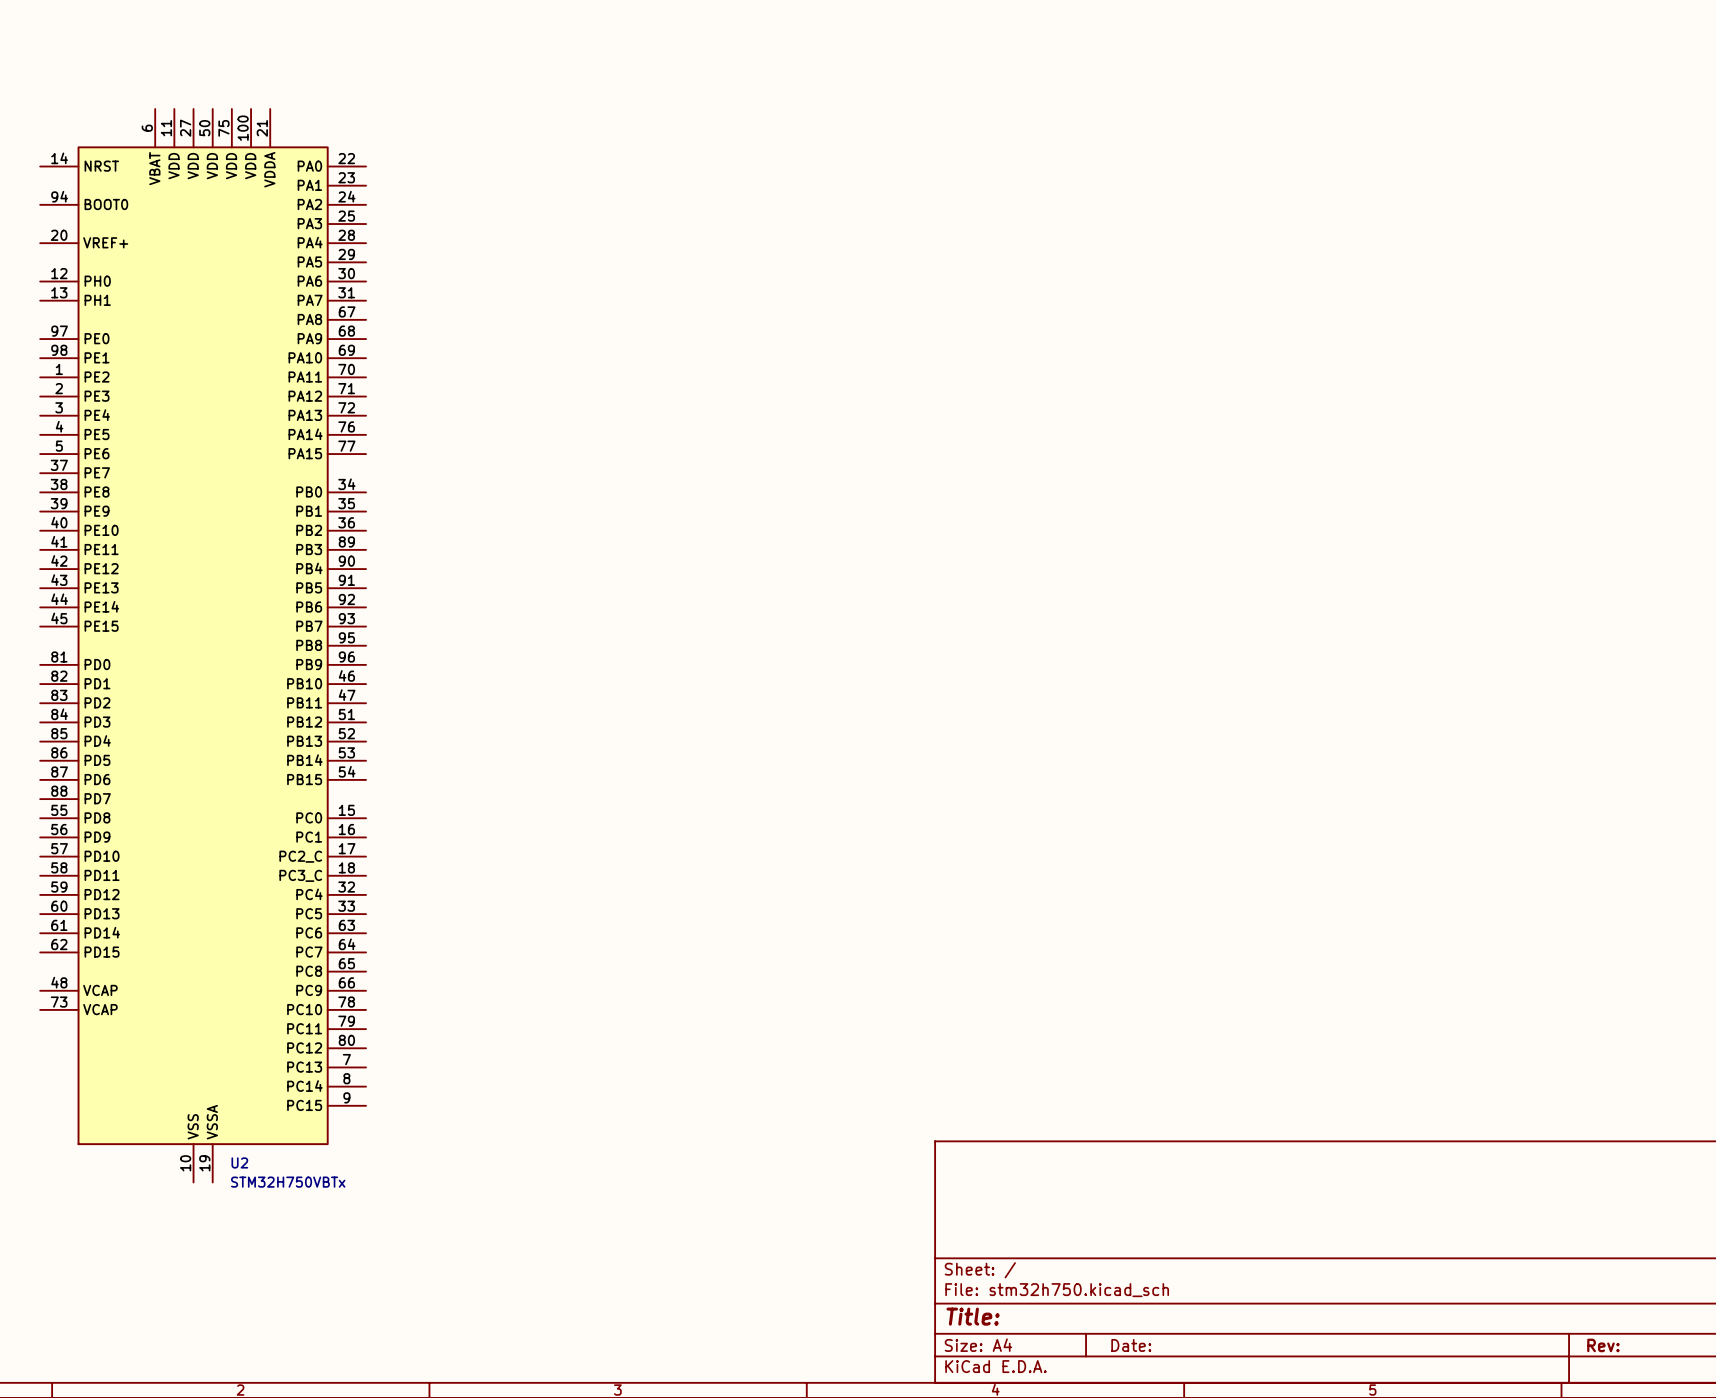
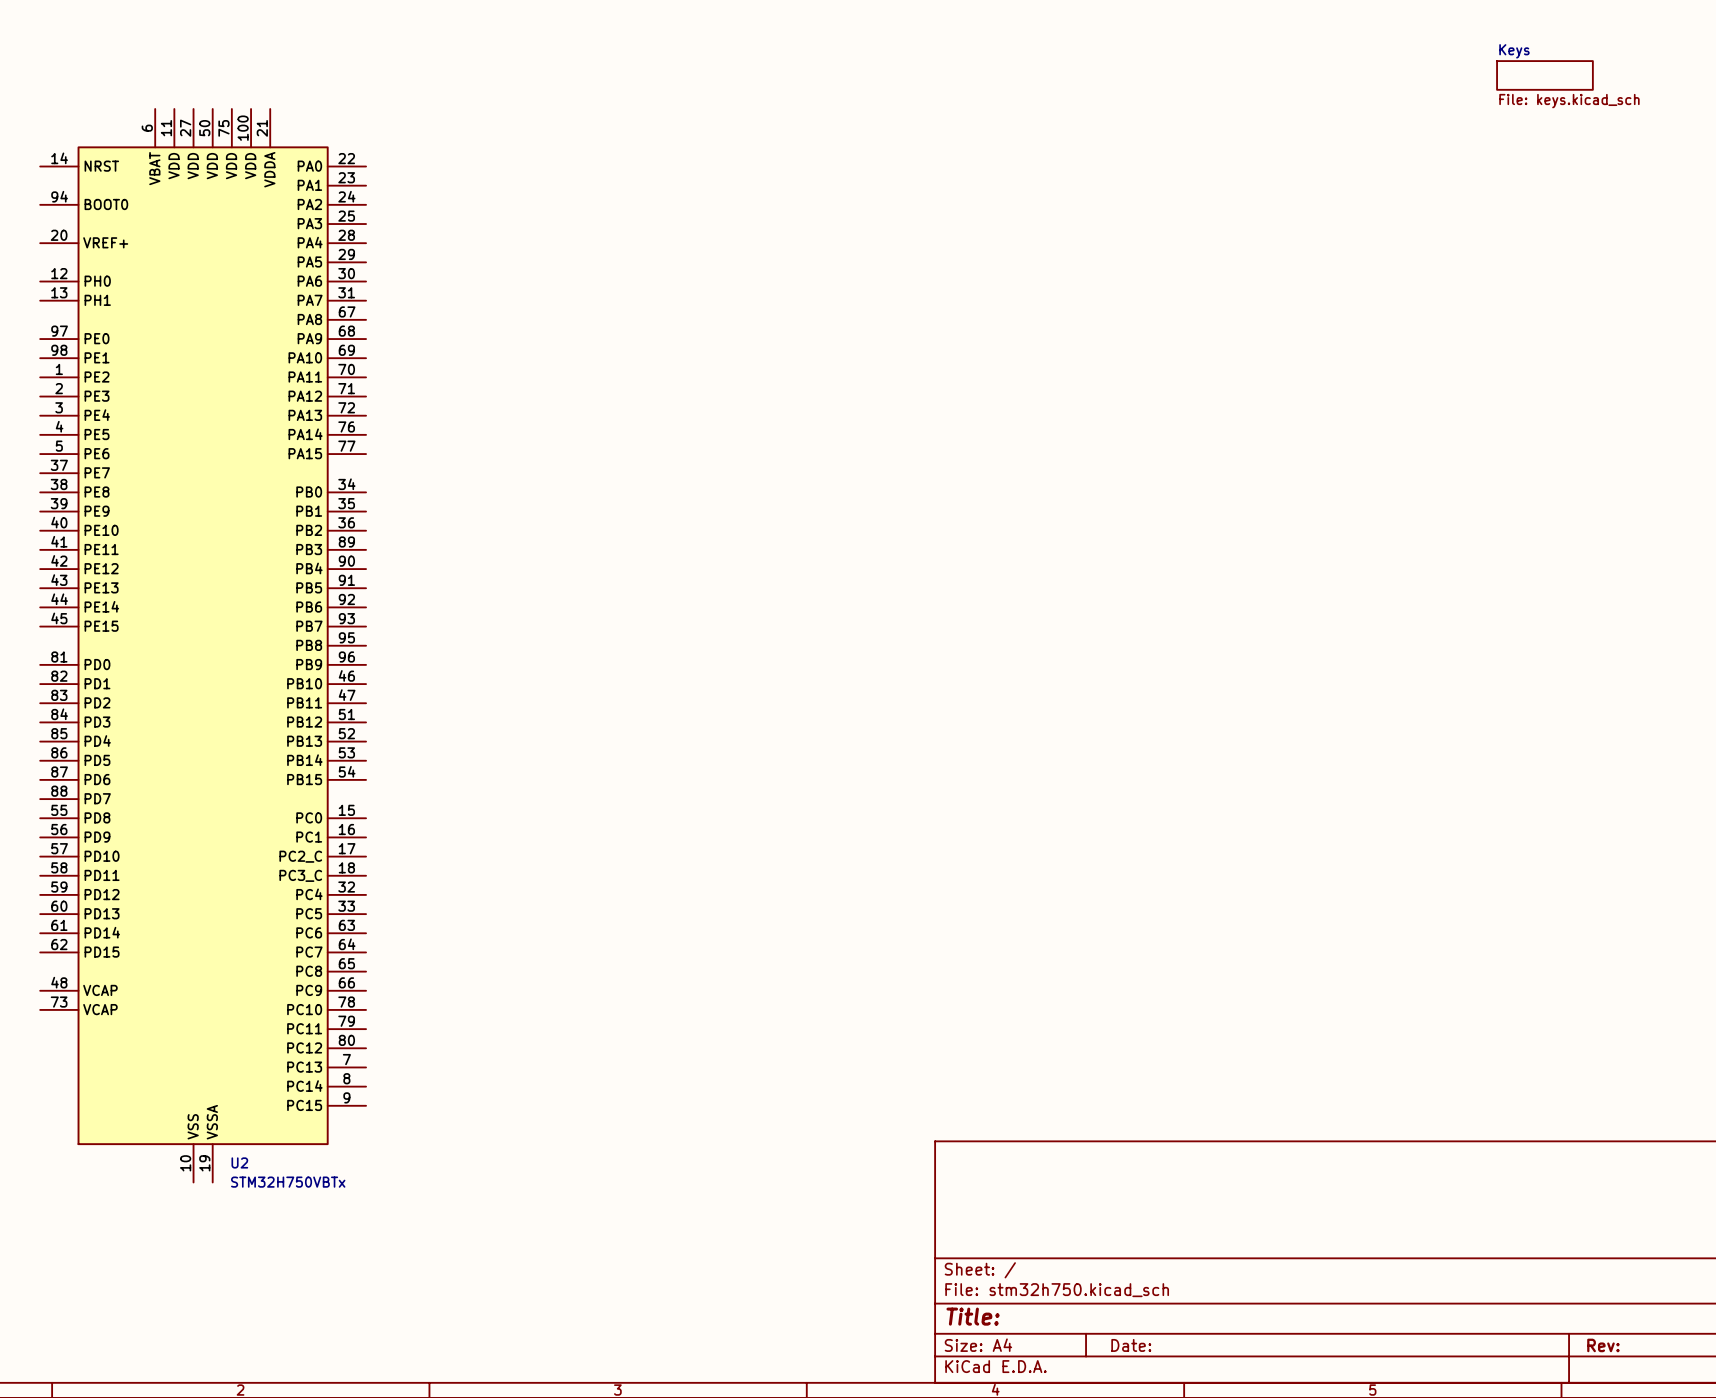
sheet Keys: none -> File: keys.kicad_sch (1544, 75)

